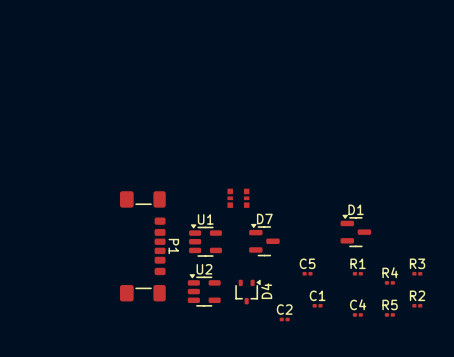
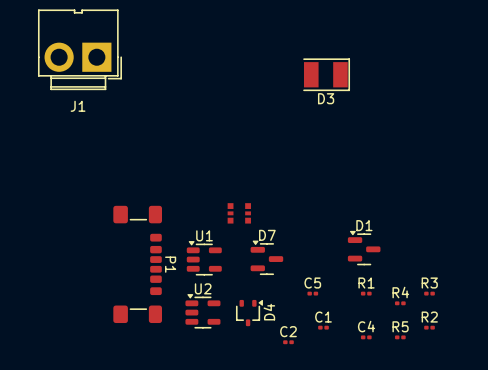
J1: none -> (79, 49)
D3: none -> (326, 74)

